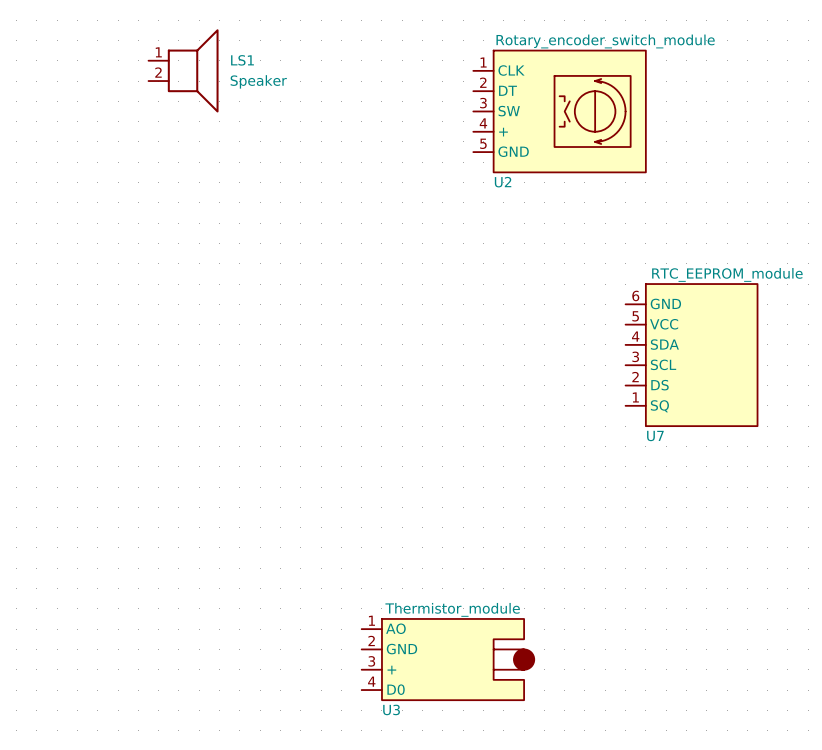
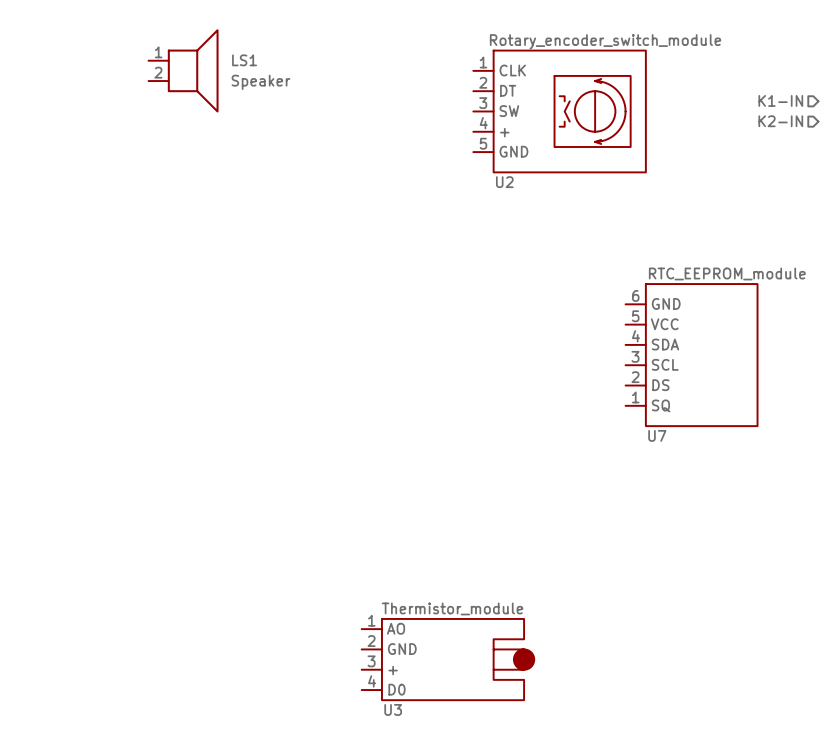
hierarchical label: none -> K1-IN (780, 100)
hierarchical label: none -> K2-IN (780, 121)

